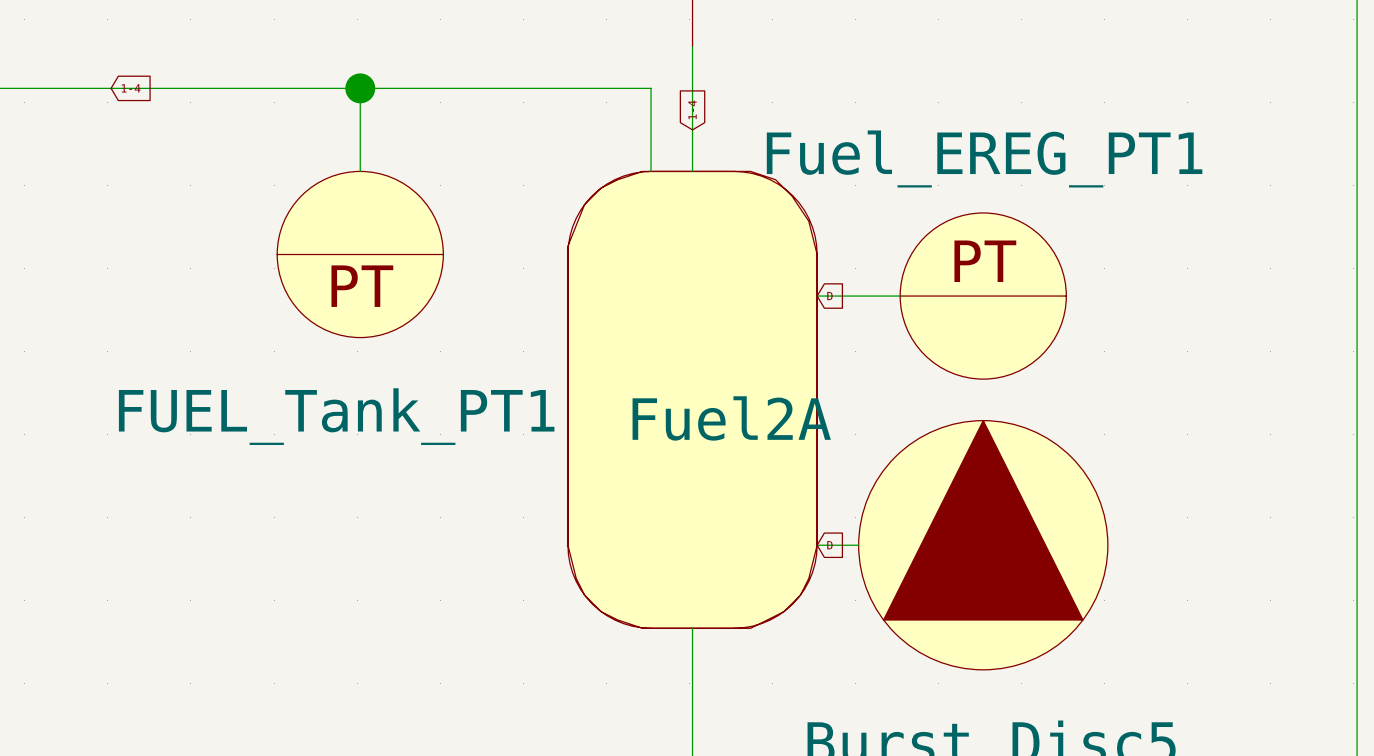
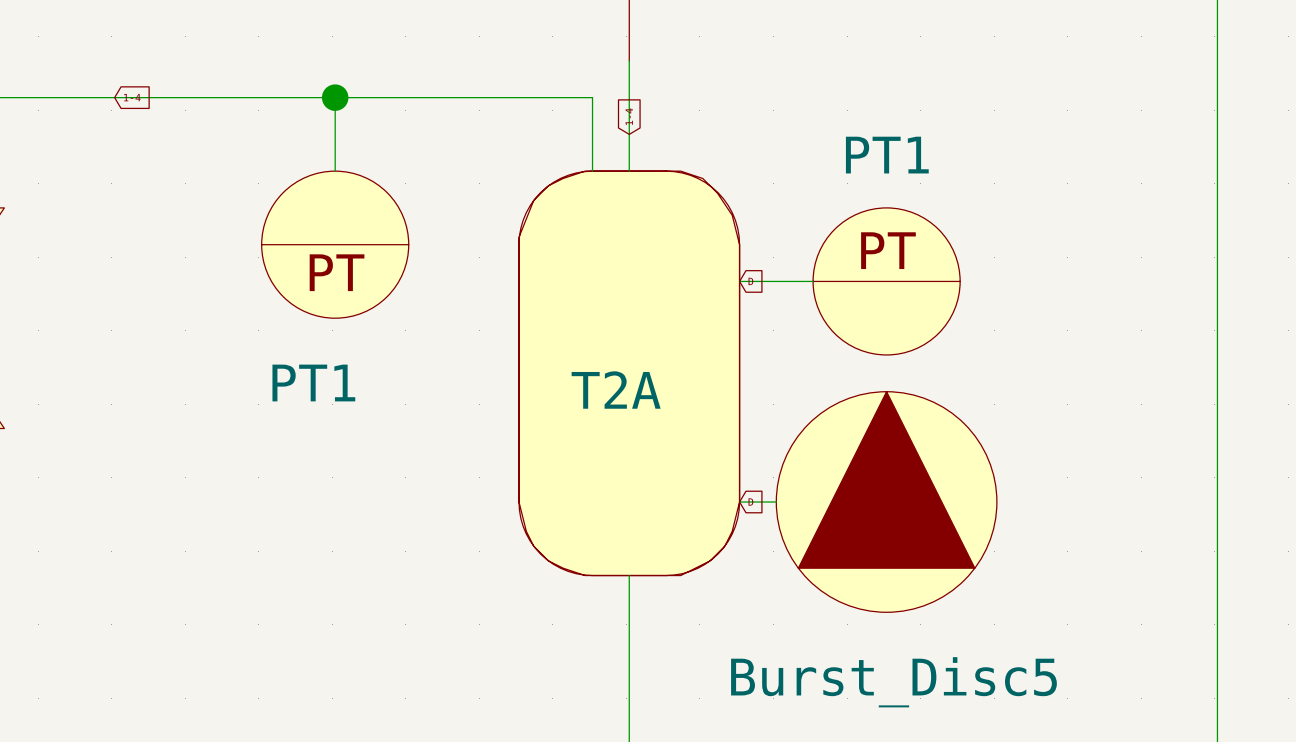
Fuel_EREG_PT1 name: Fuel_EREG_PT1 (984, 158) -> PT1 (887, 155)
FUEL_Tank_PT1 name: FUEL_Tank_PT1 (336, 416) -> PT1 (313, 382)
Fuel2A name: Fuel2A (731, 418) -> T2A (616, 390)

